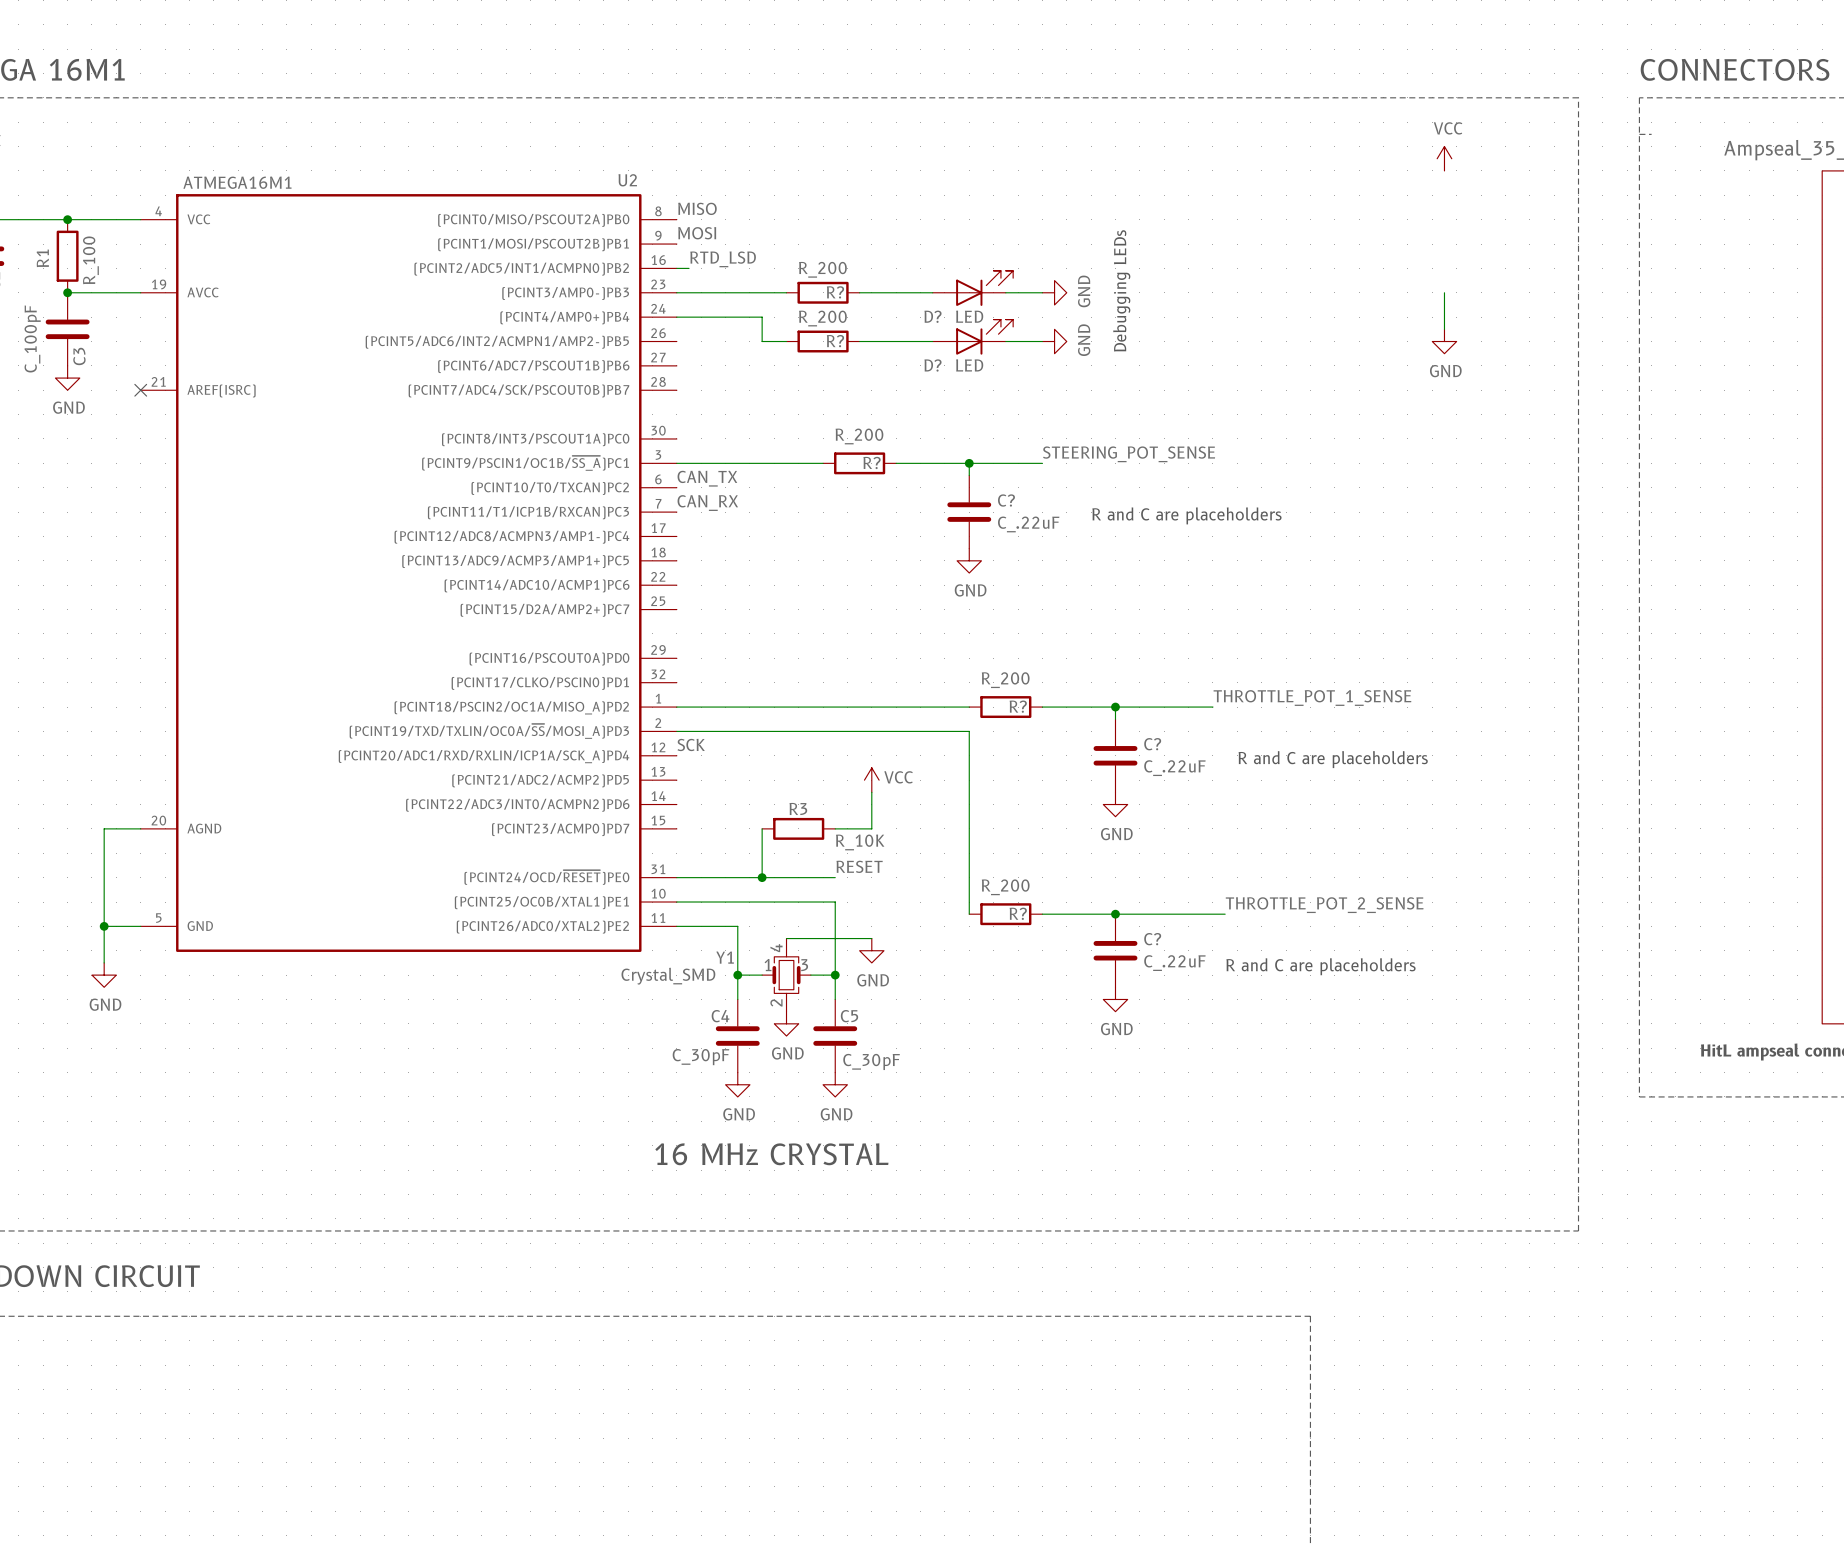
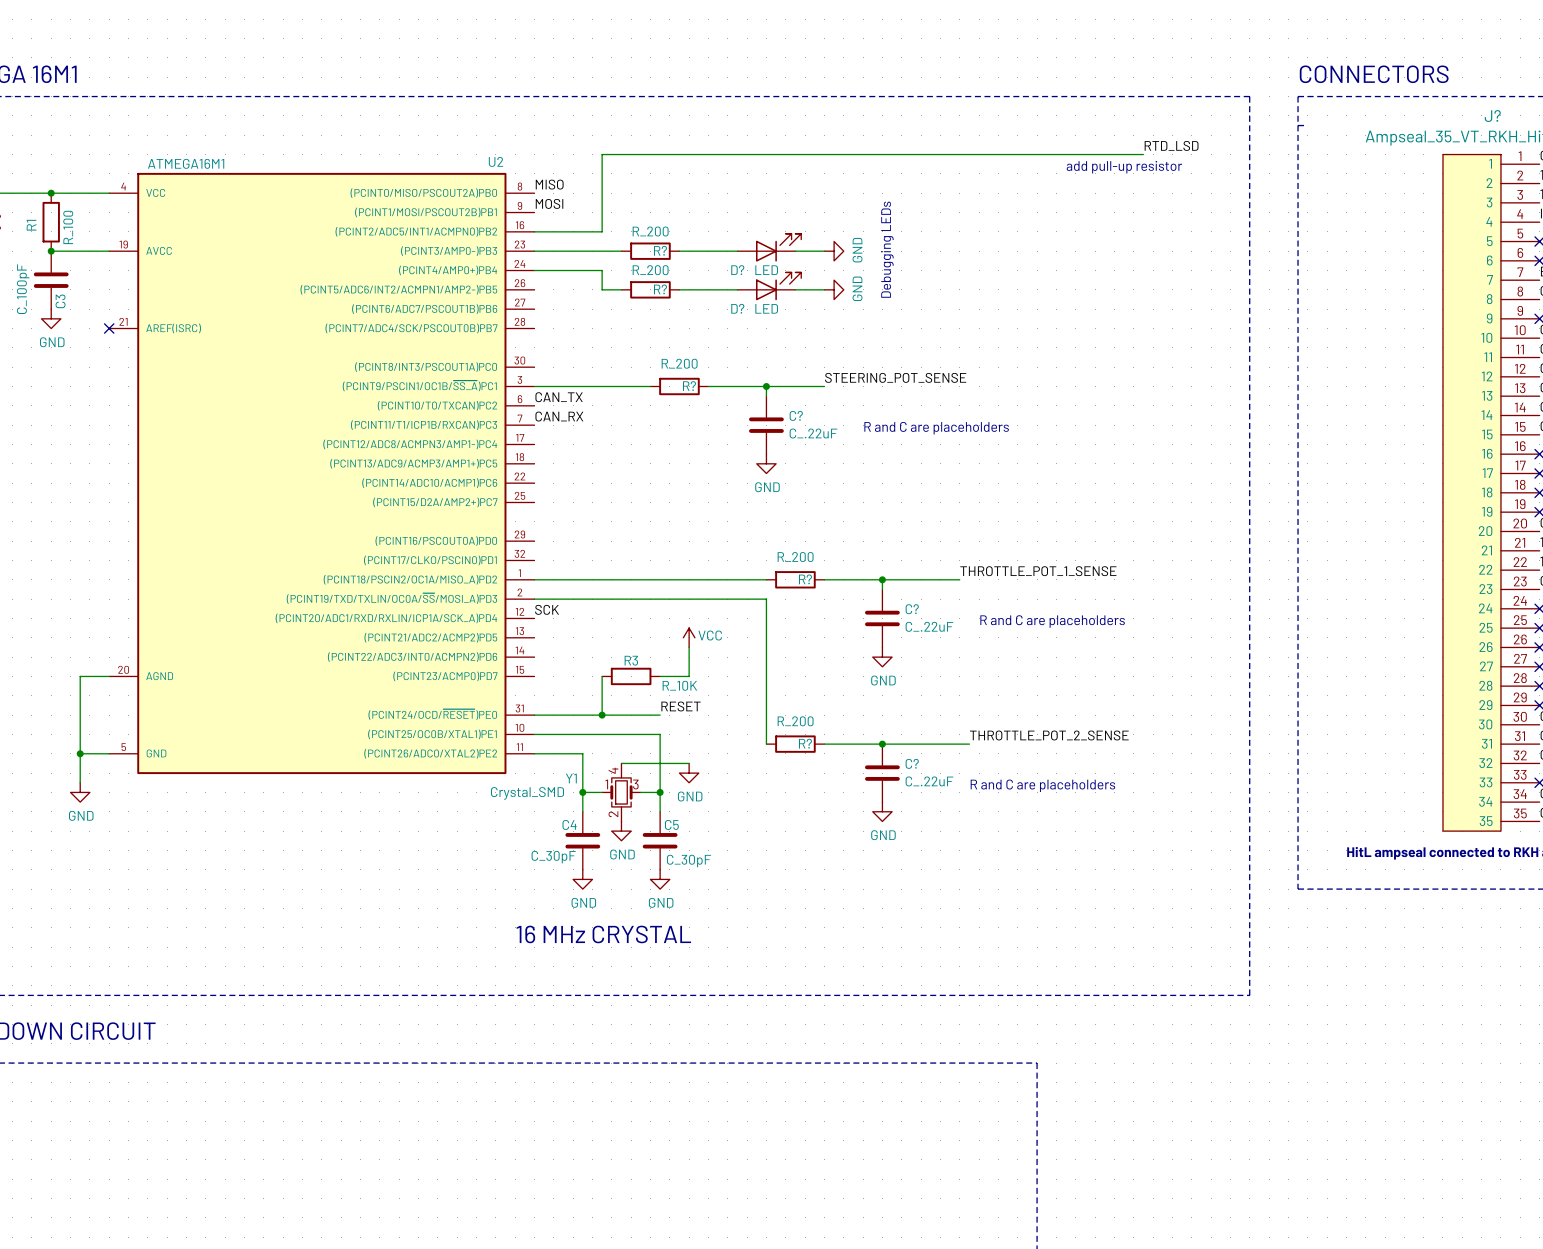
power symbol: VCC (1444, 158) -> none
label: none -> RTD_LSD (1171, 145)
wire: none -> (1143, 154) (602, 154) (602, 231) (544, 231)
text: none -> add pull-up resistor (1124, 167)
label: RTD_LSD (723, 259) -> none
wire: (1444, 292) (1444, 329) -> none
power symbol: GND (1444, 341) -> none

